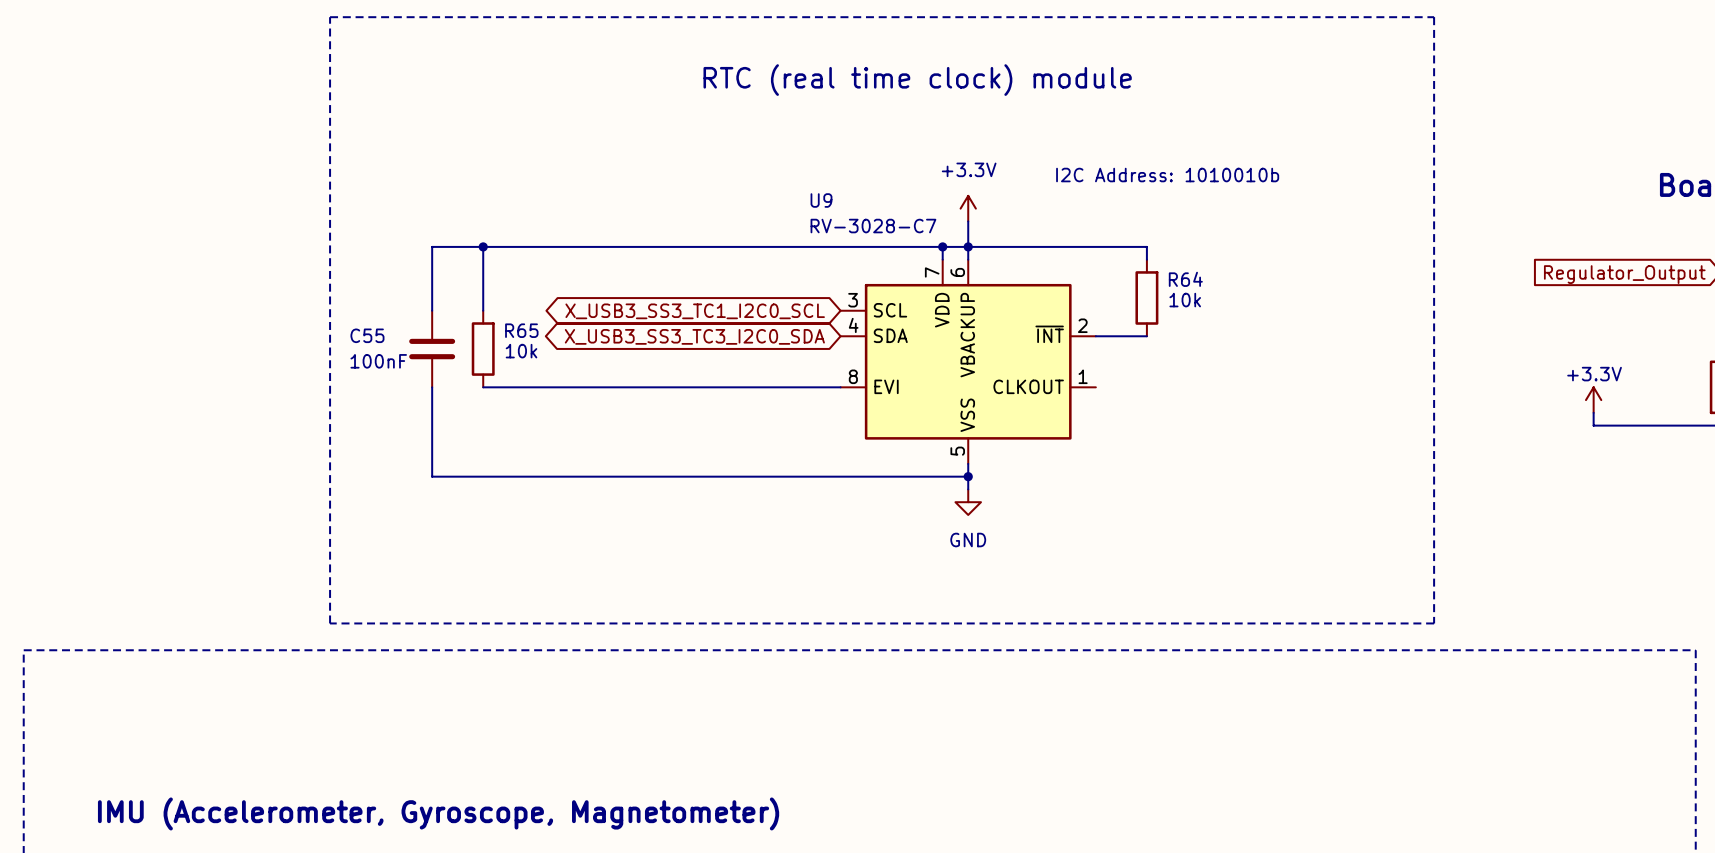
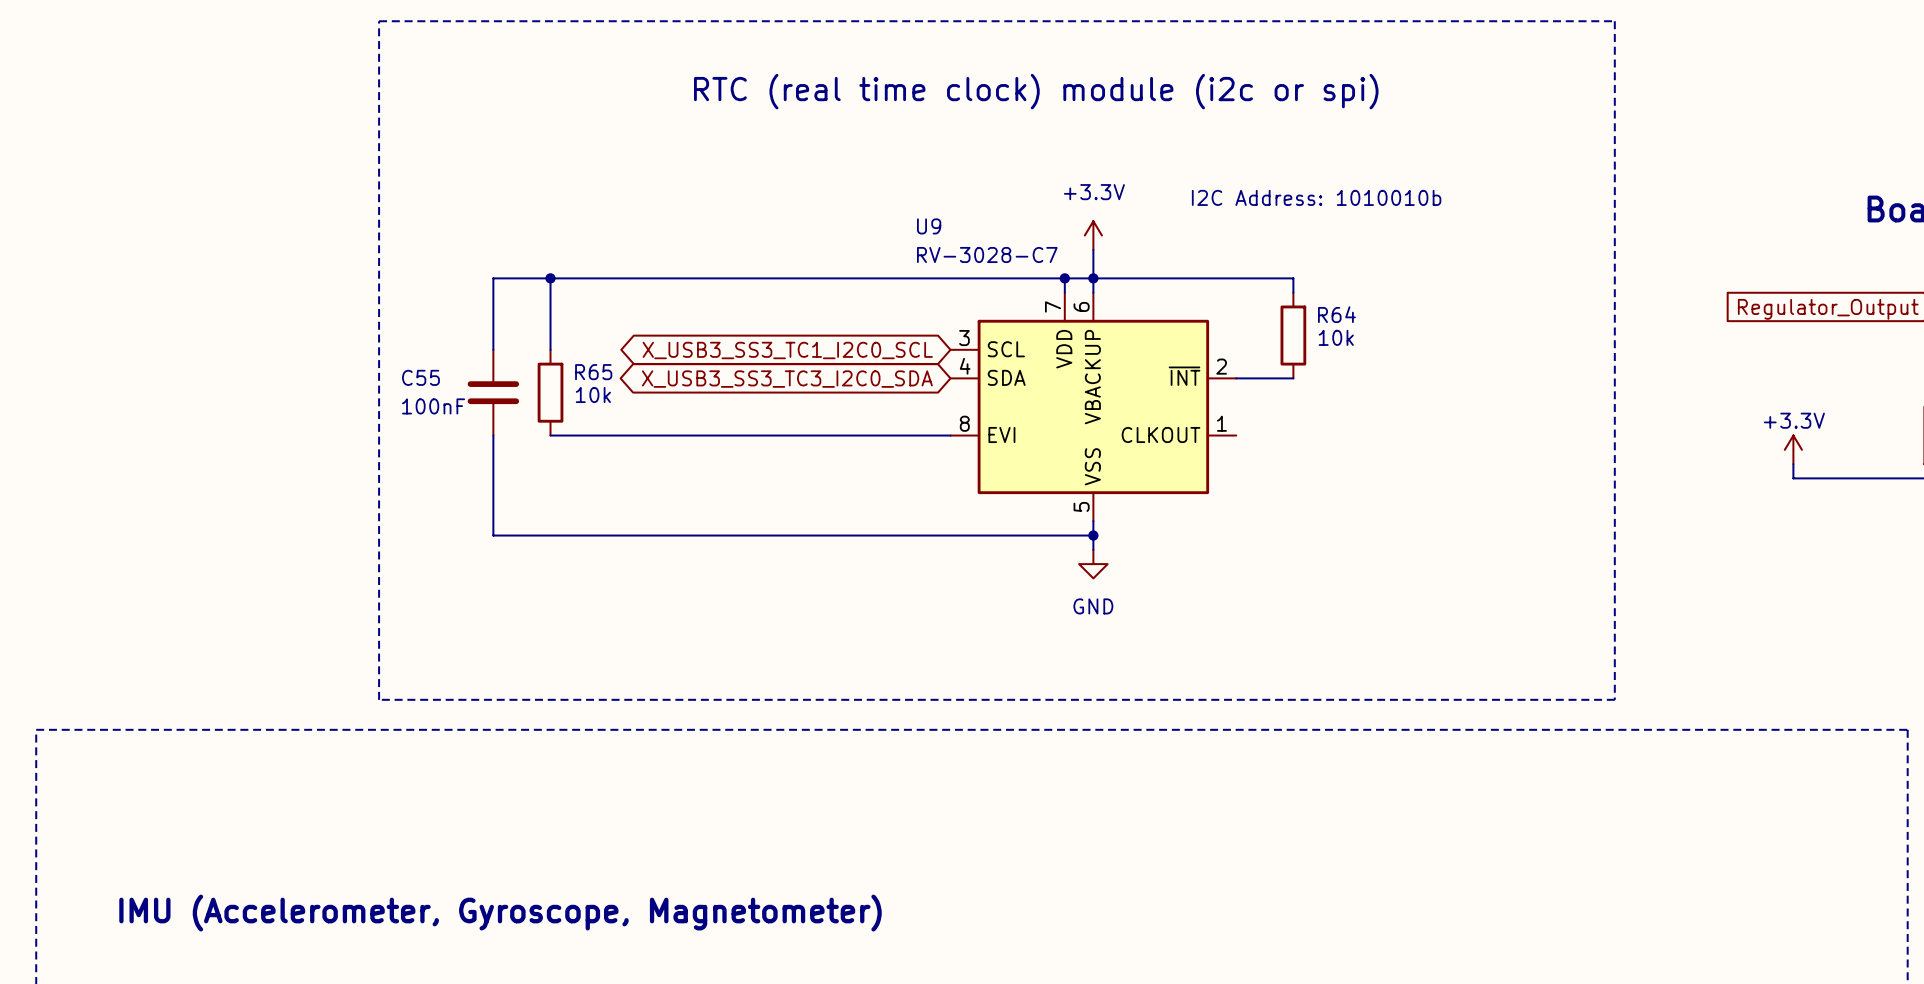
text: RTC (real time clock) module (917, 80) -> RTC (real time clock) module (i2c or spi) (1036, 91)

